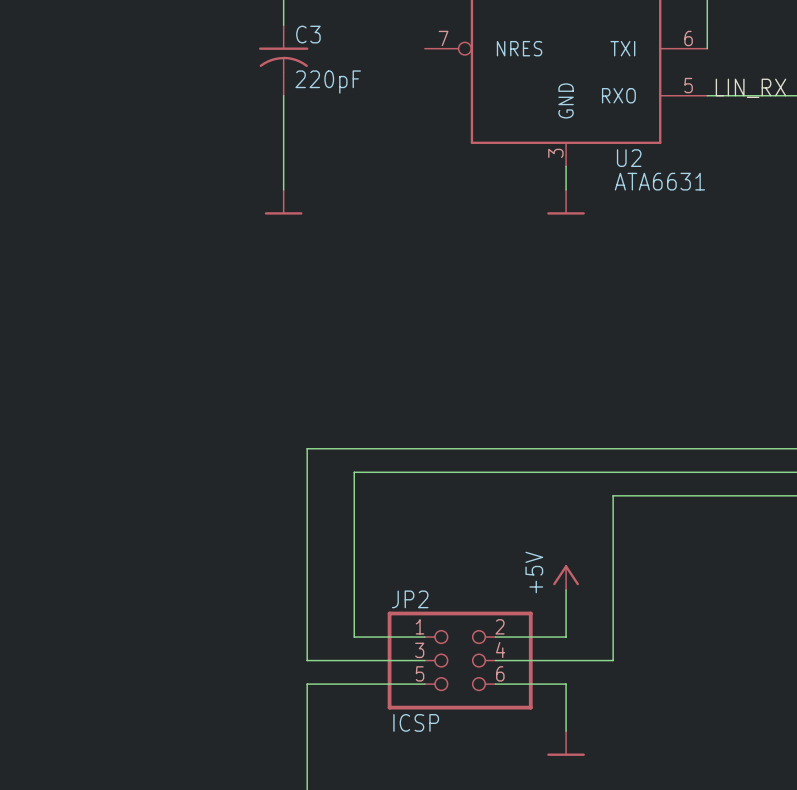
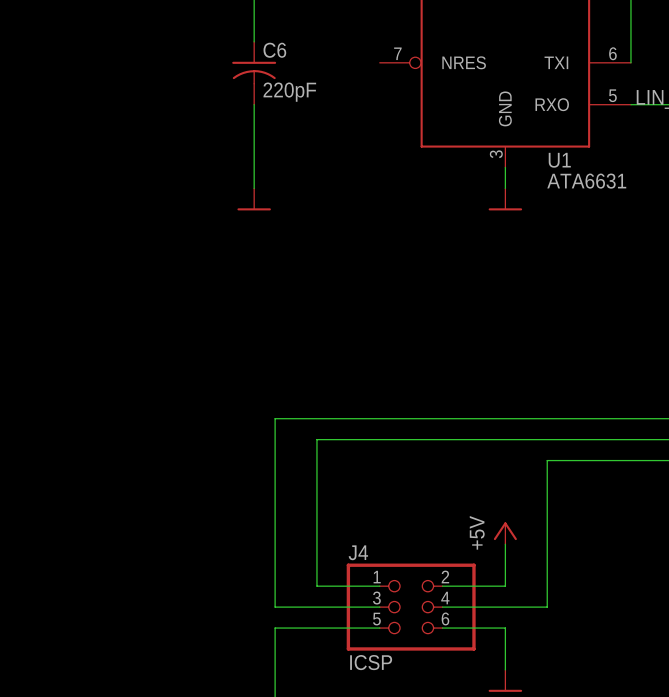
C3 name: C3 (308, 34) -> C6 (274, 50)
U2 name: U2 (629, 158) -> U1 (559, 160)
JP2 name: JP2 (410, 599) -> J4 (358, 552)

